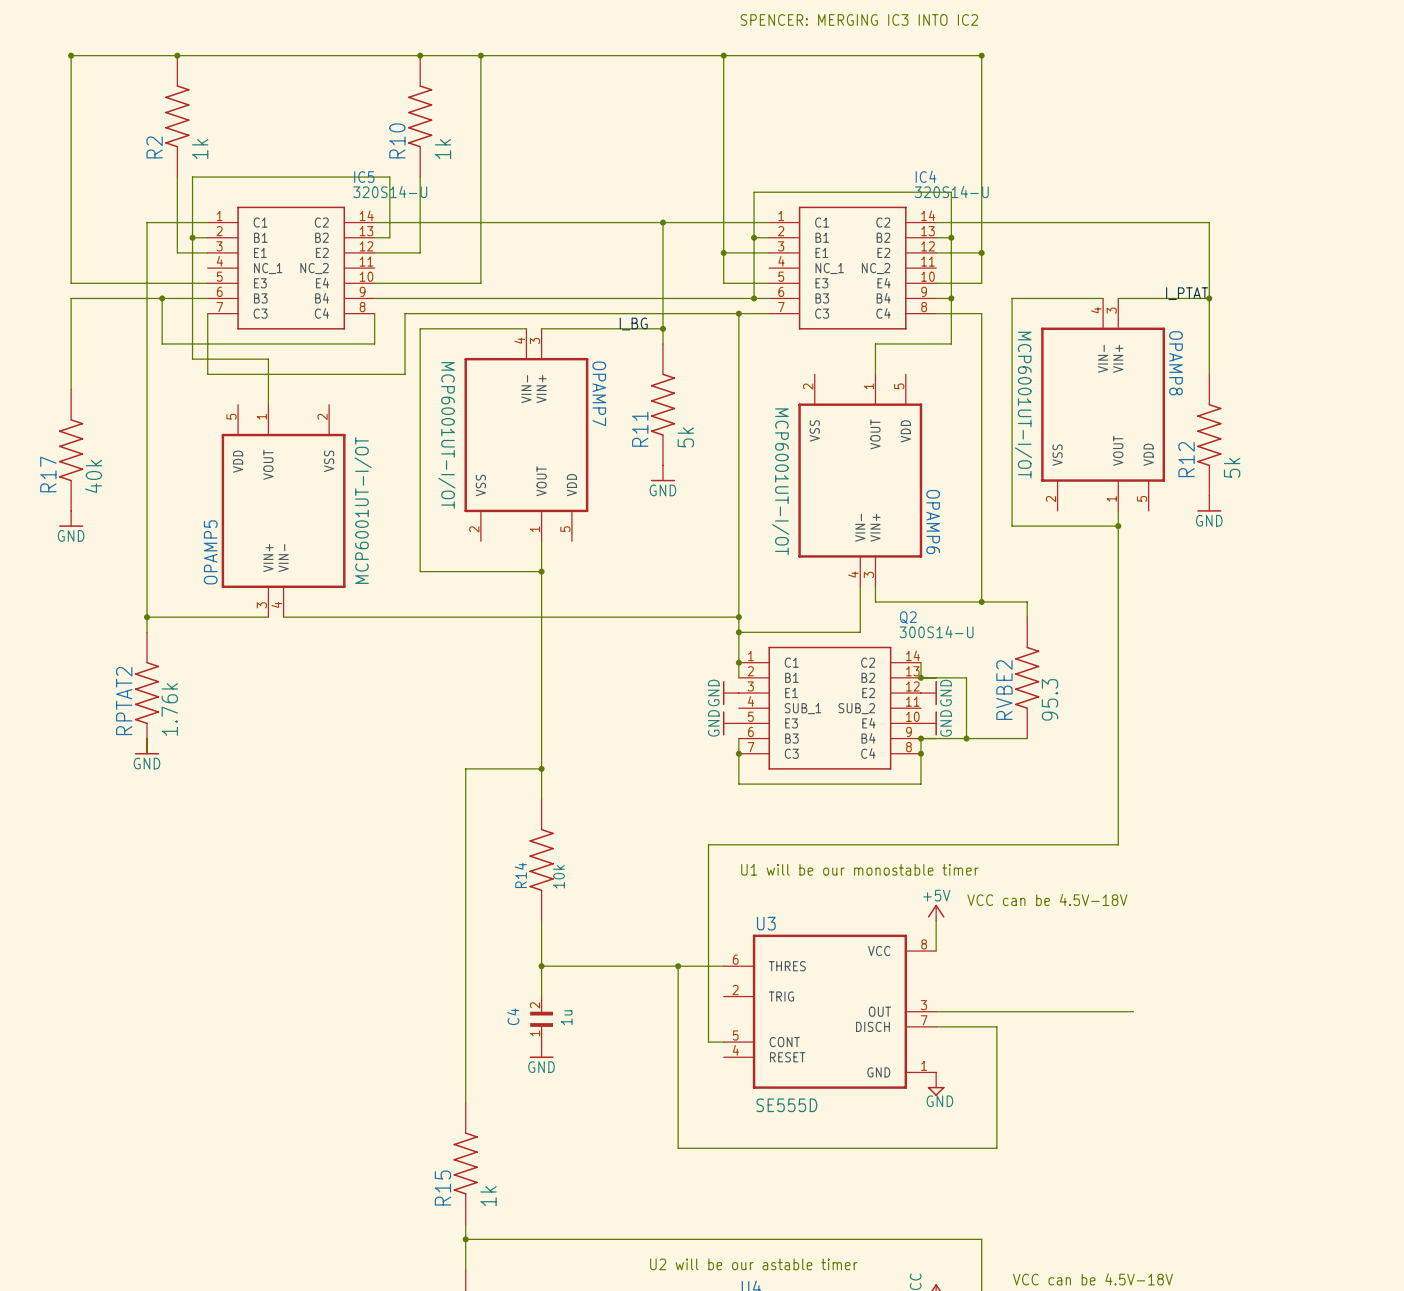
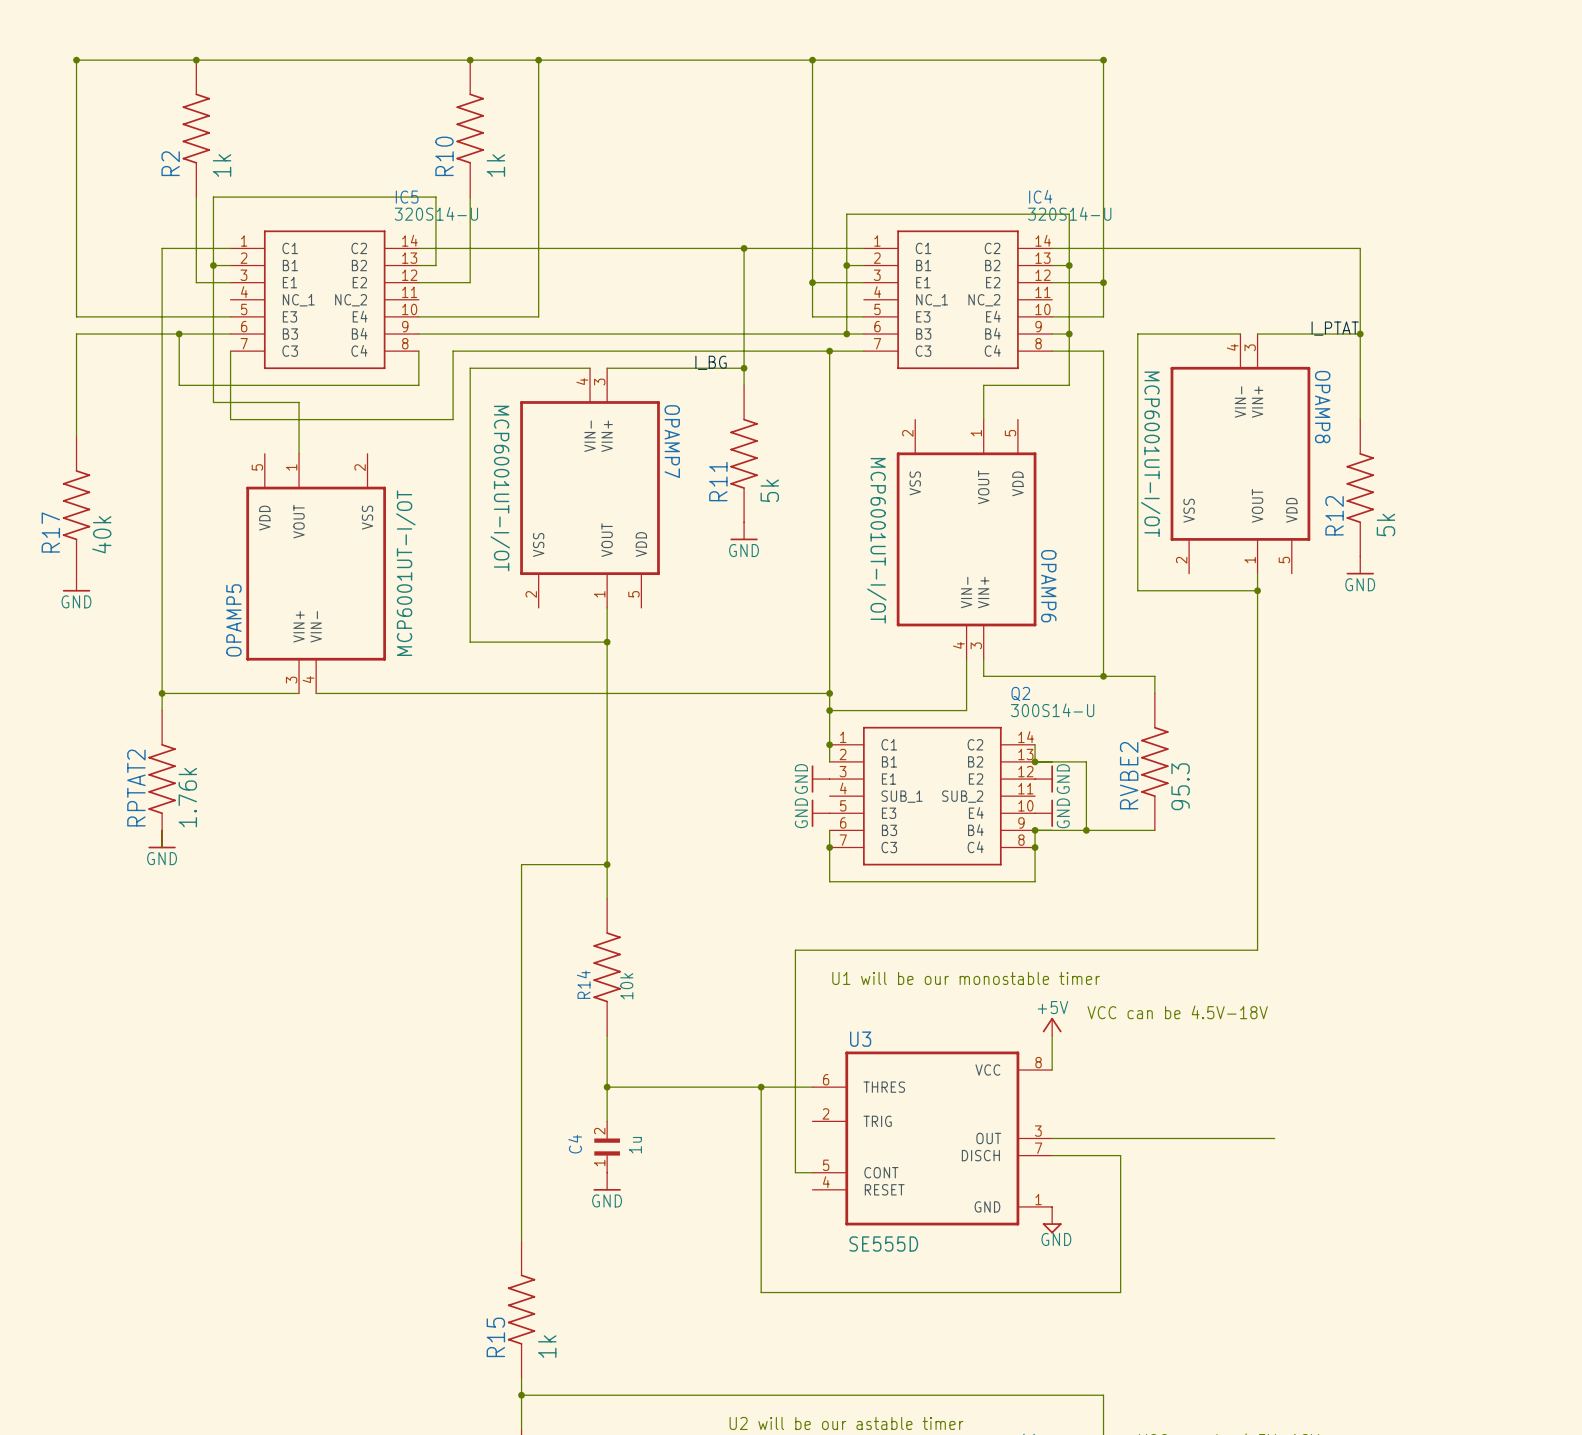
text: SPENCER: MERGING IC3 INTO IC2 (859, 19) -> none

